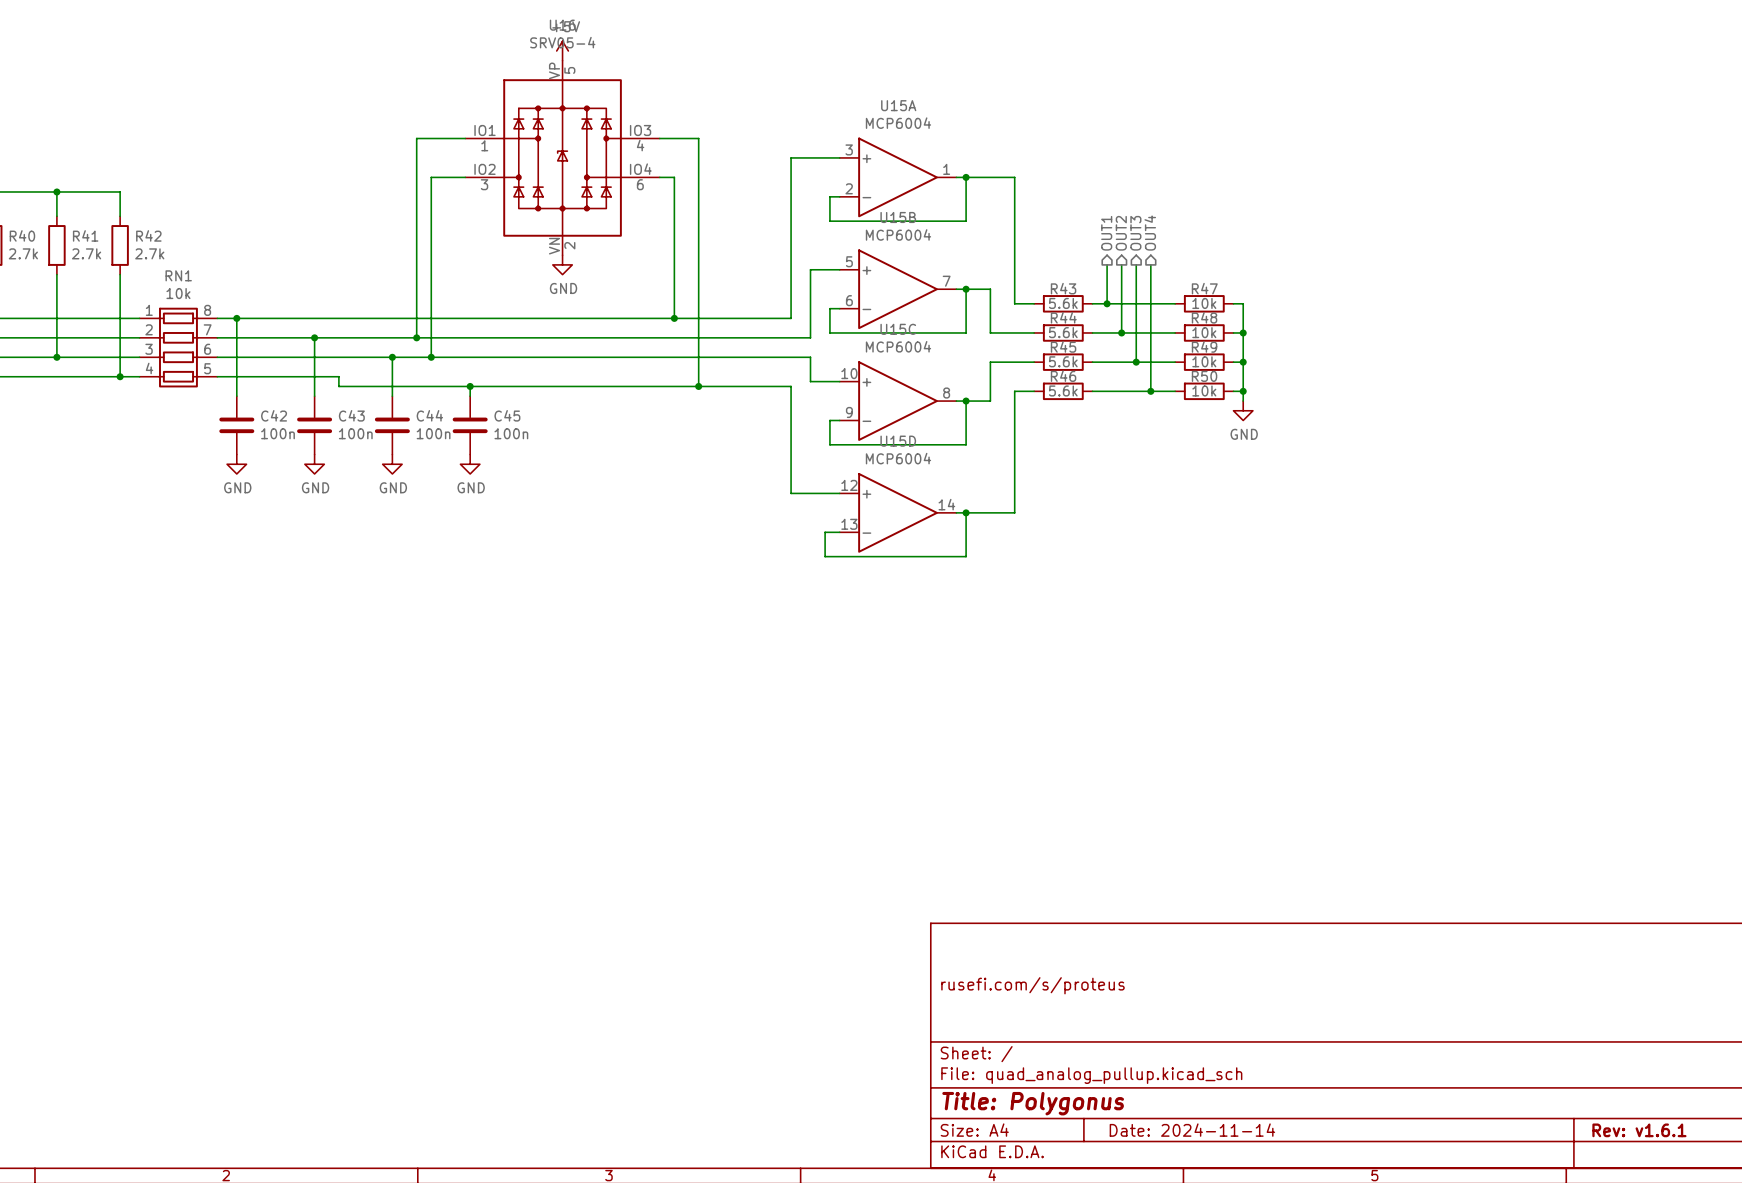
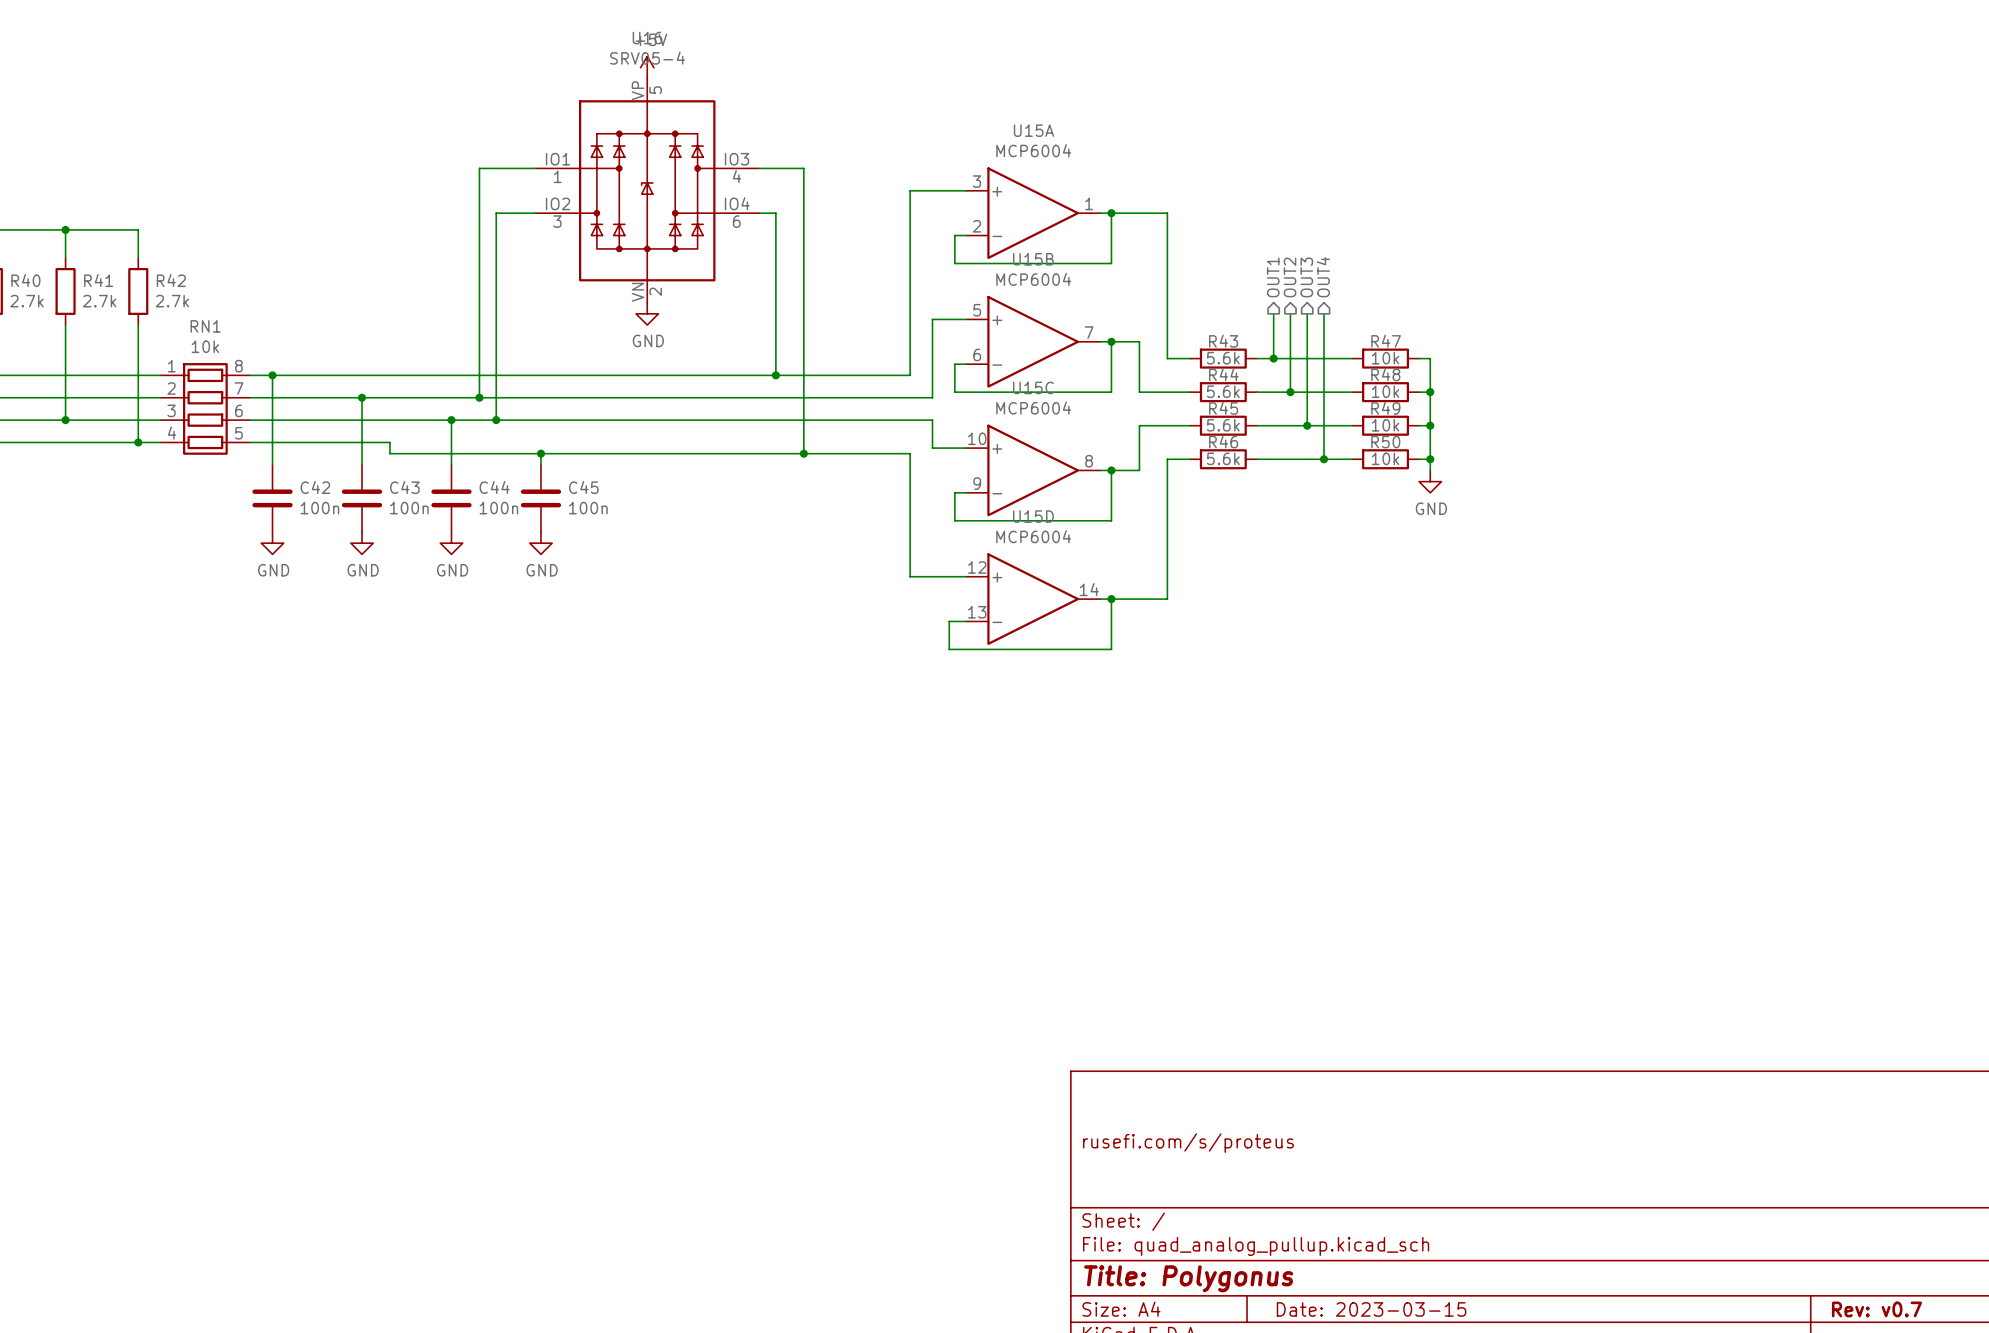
title block: Date: 2024-11-14 (1192, 1130) -> Date: 2023-03-15 (1371, 1309)
title block: Rev: v1.6.1 (1639, 1130) -> Rev: v0.7 (1876, 1309)

